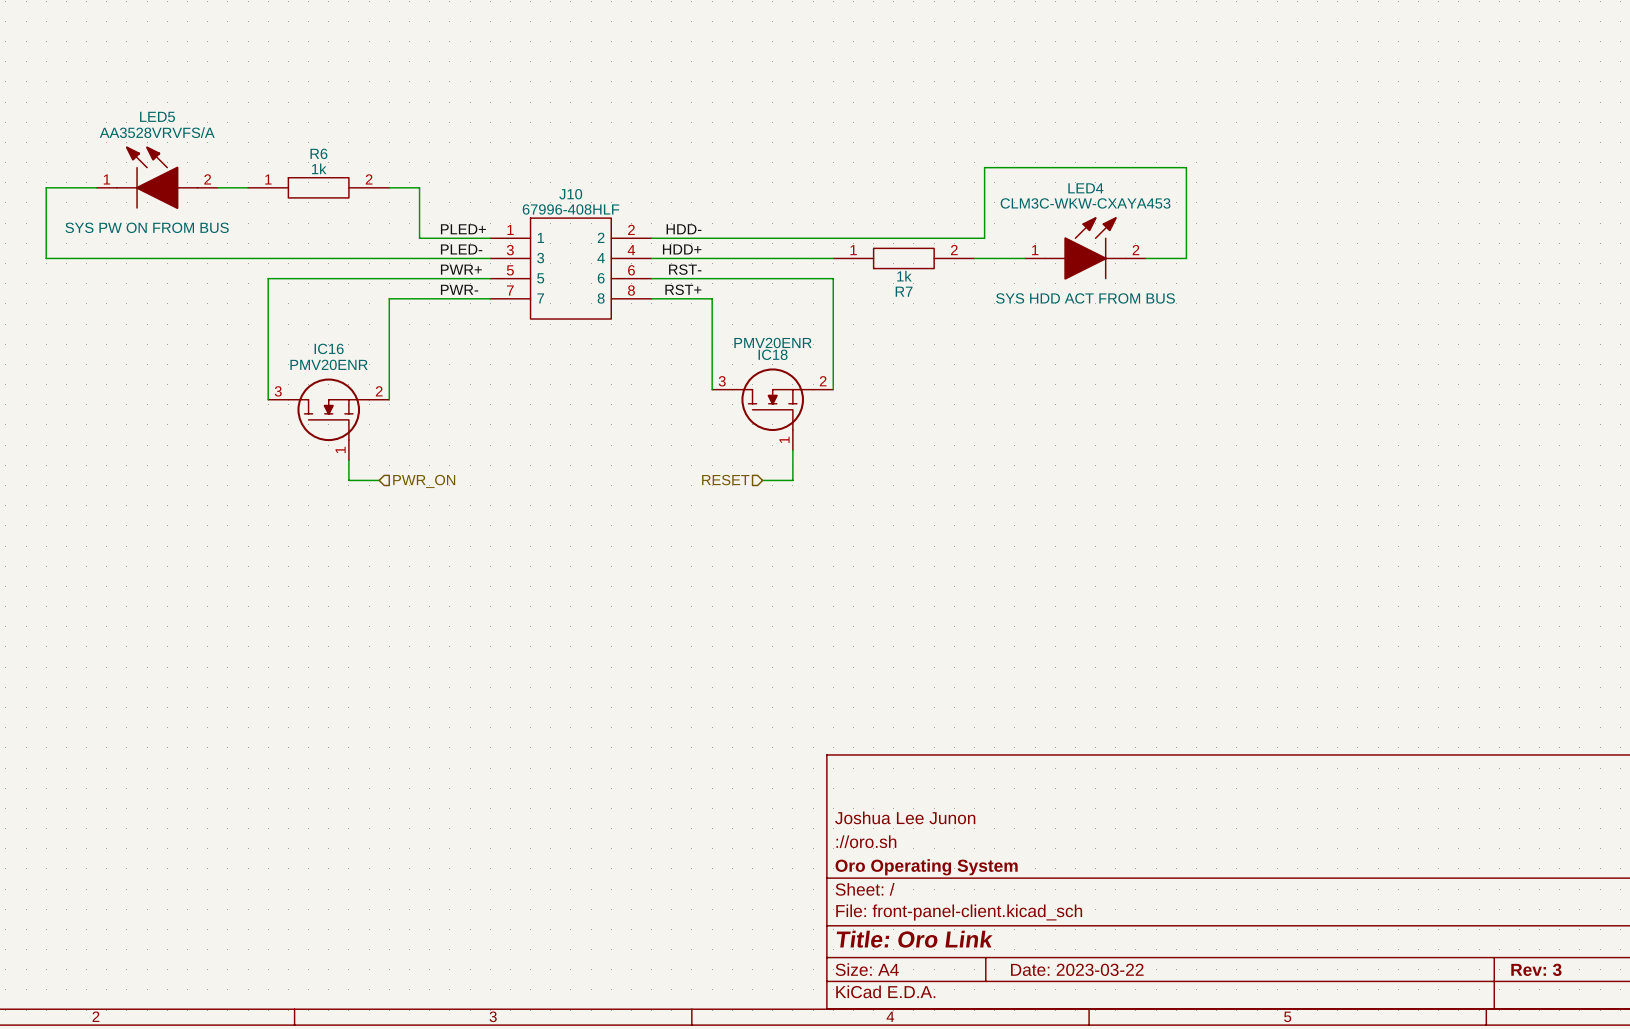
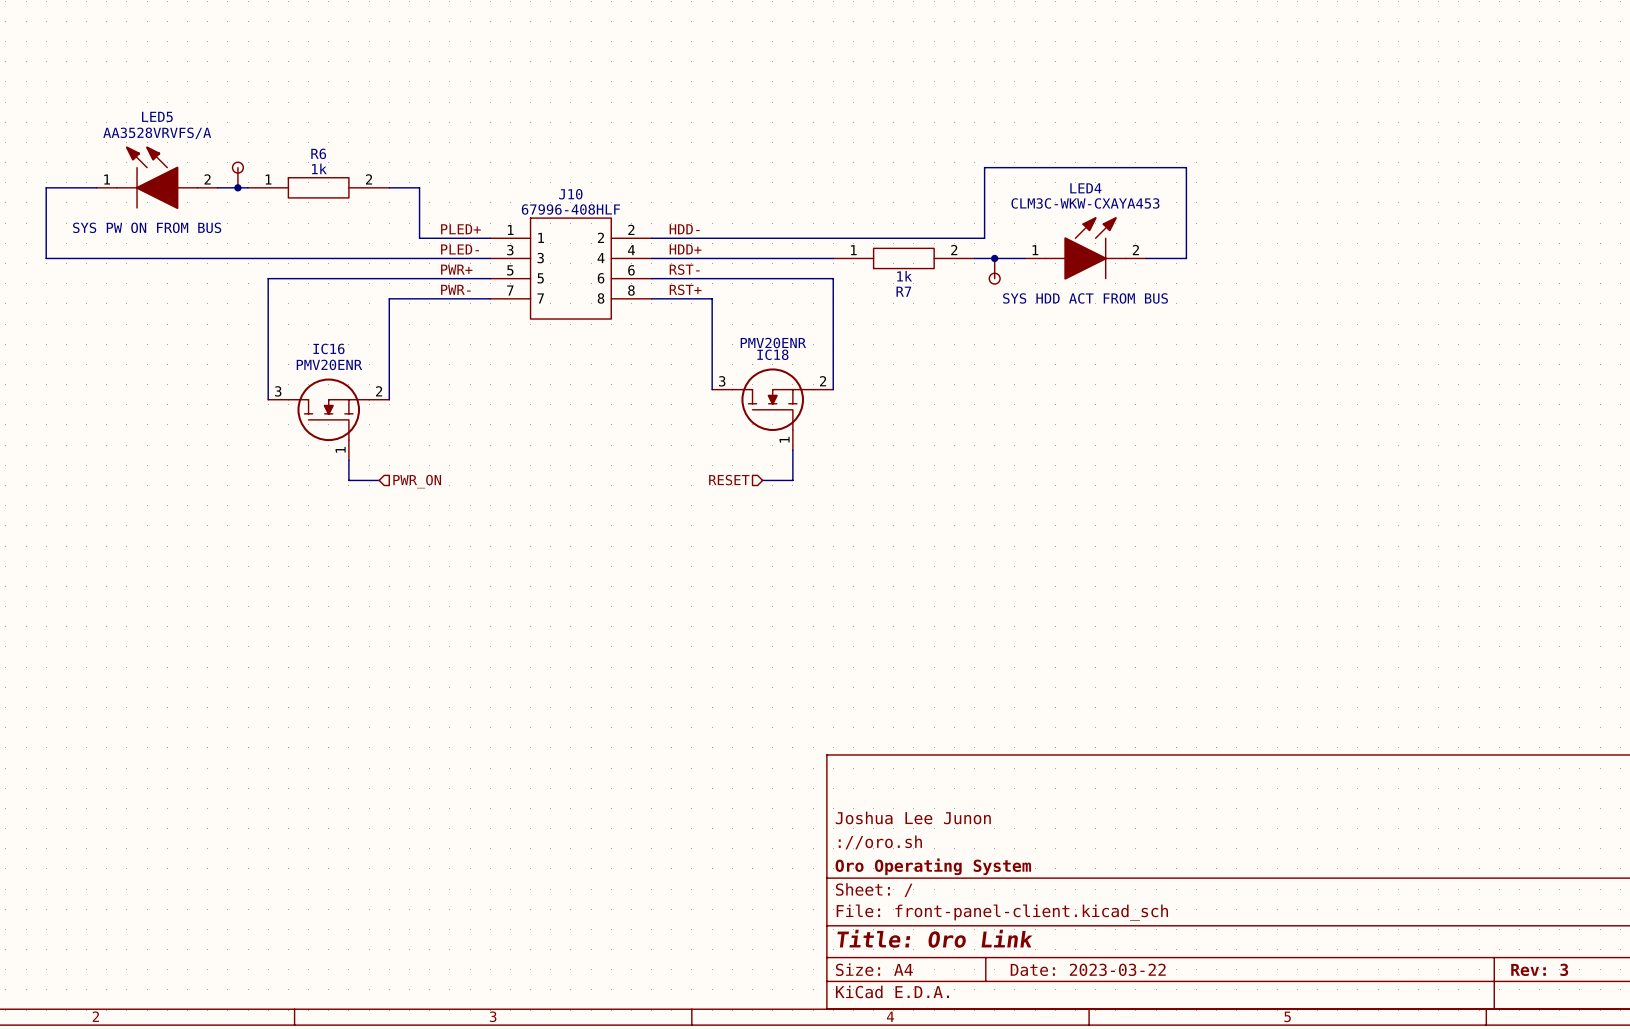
part: none -> (237, 175)
junction: none -> (237, 187)
junction: none -> (994, 258)
part: none -> (994, 271)

